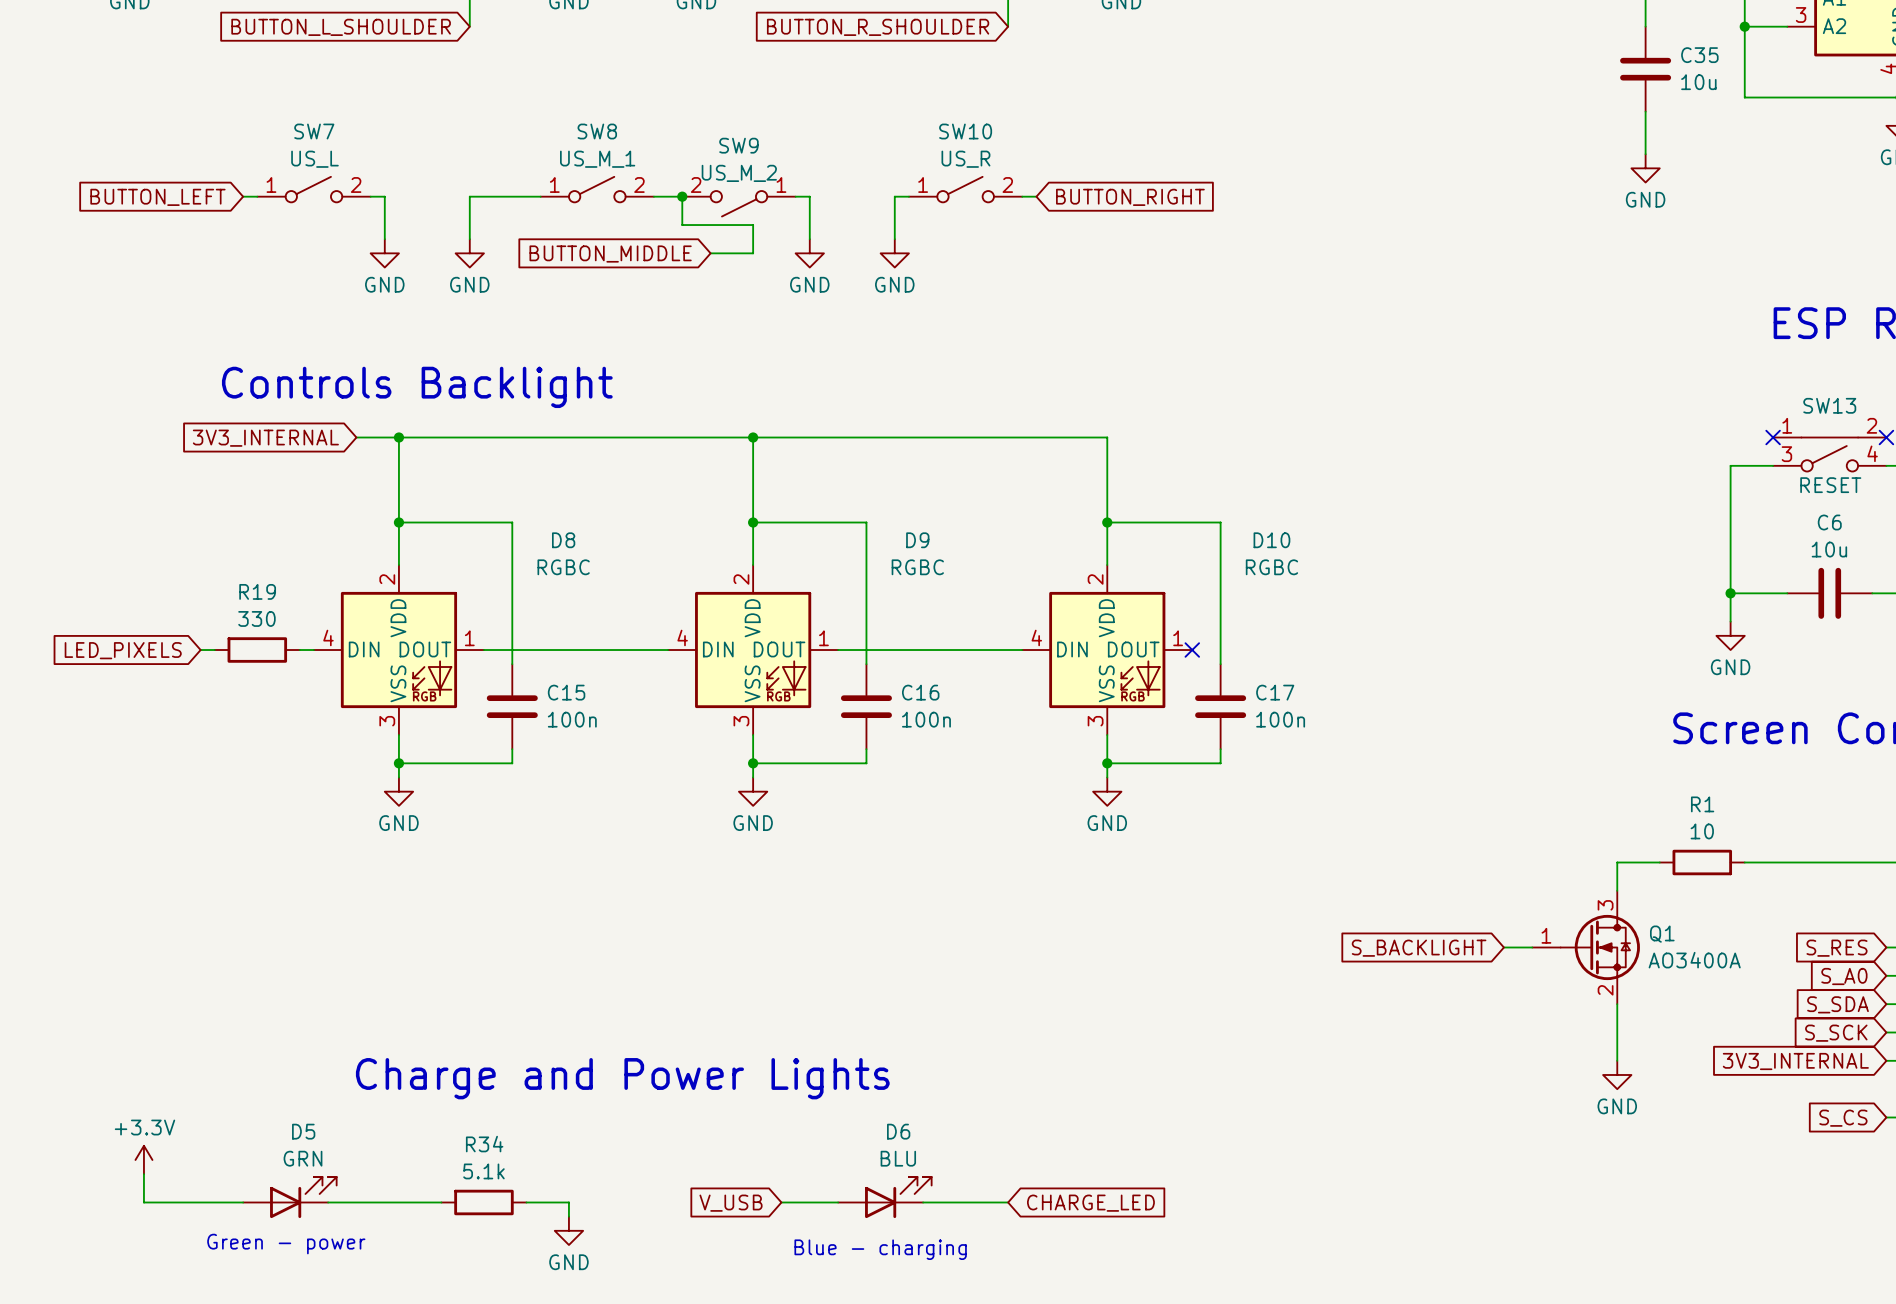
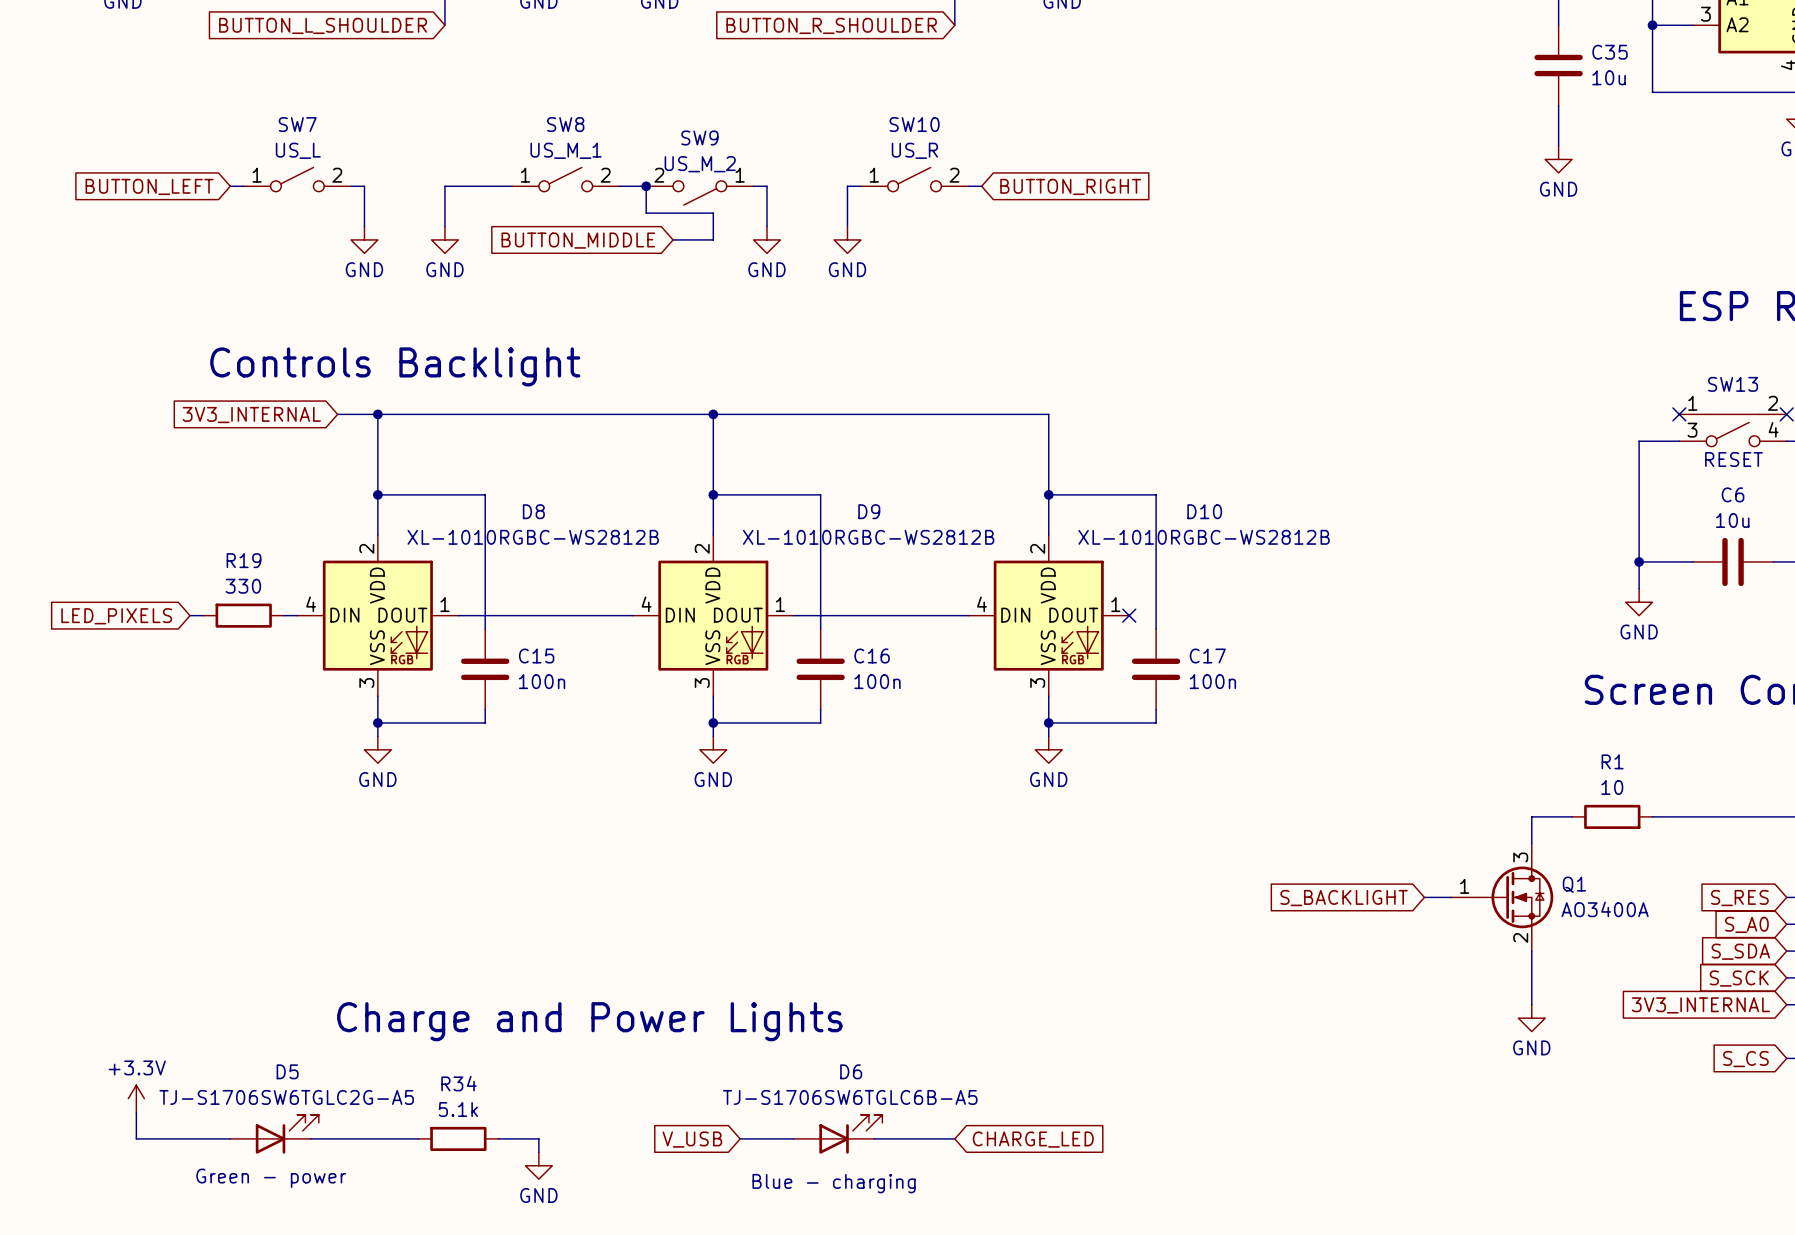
D8 value: RGBC (563, 567) -> XL-1010RGBC-WS2812B (533, 537)
D9 value: RGBC (917, 567) -> XL-1010RGBC-WS2812B (868, 537)
D10 value: RGBC (1271, 567) -> XL-1010RGBC-WS2812B (1204, 537)
D5 value: GRN (303, 1158) -> TJ-S1706SW6TGLC2G-A5 (286, 1097)
D6 value: BLU (898, 1158) -> TJ-S1706SW6TGLC6B-A5 (850, 1097)

